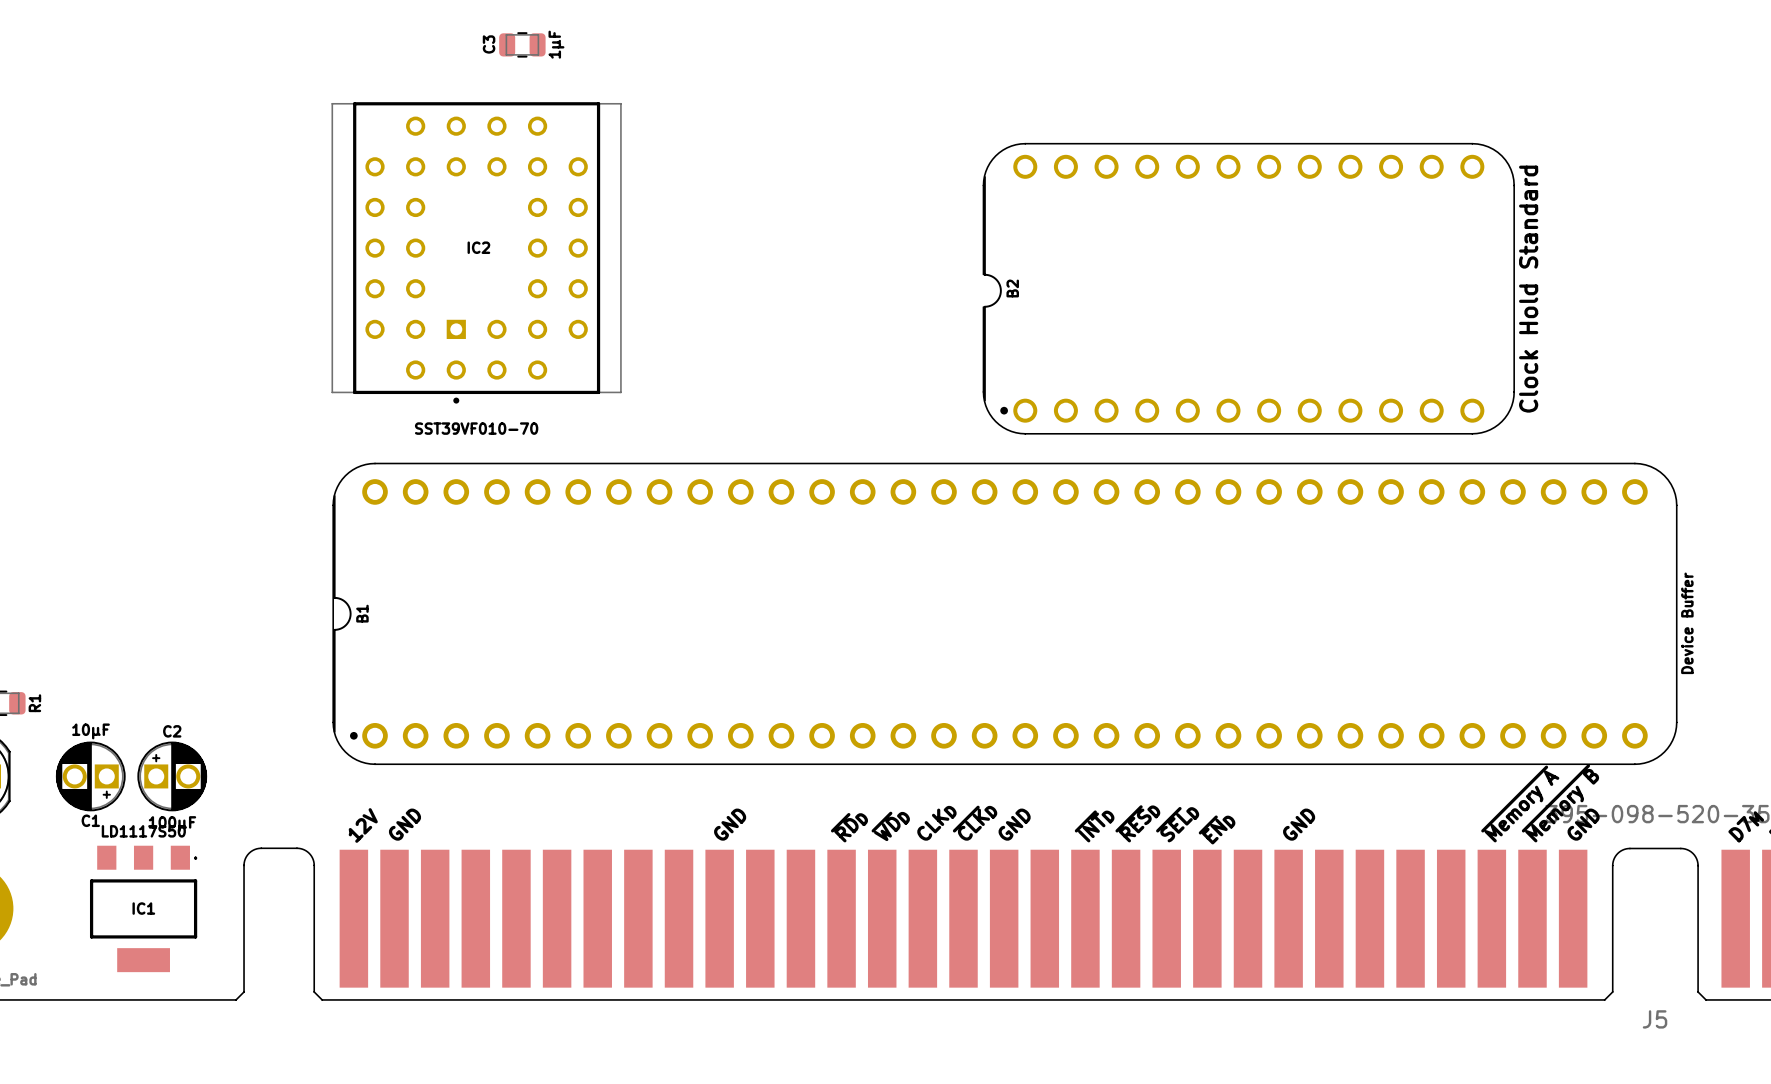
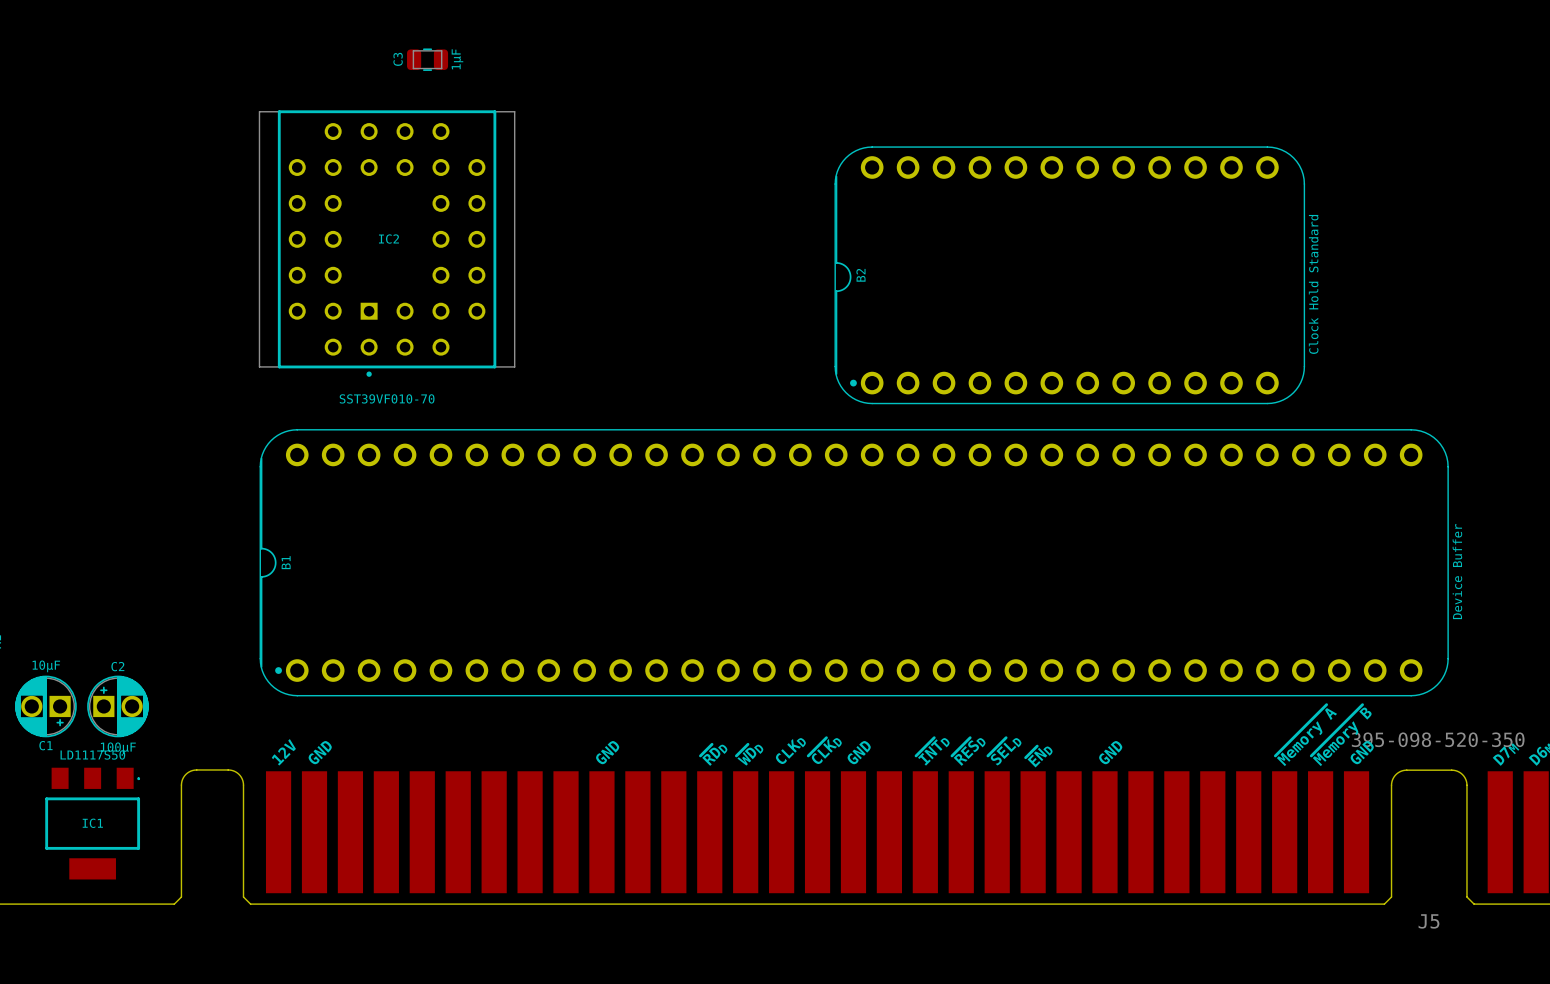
B2 footprint: [982, 142, 1515, 435] -> [834, 146, 1306, 405]
B2 text: Clock Hold Standard (1528, 289) -> none

